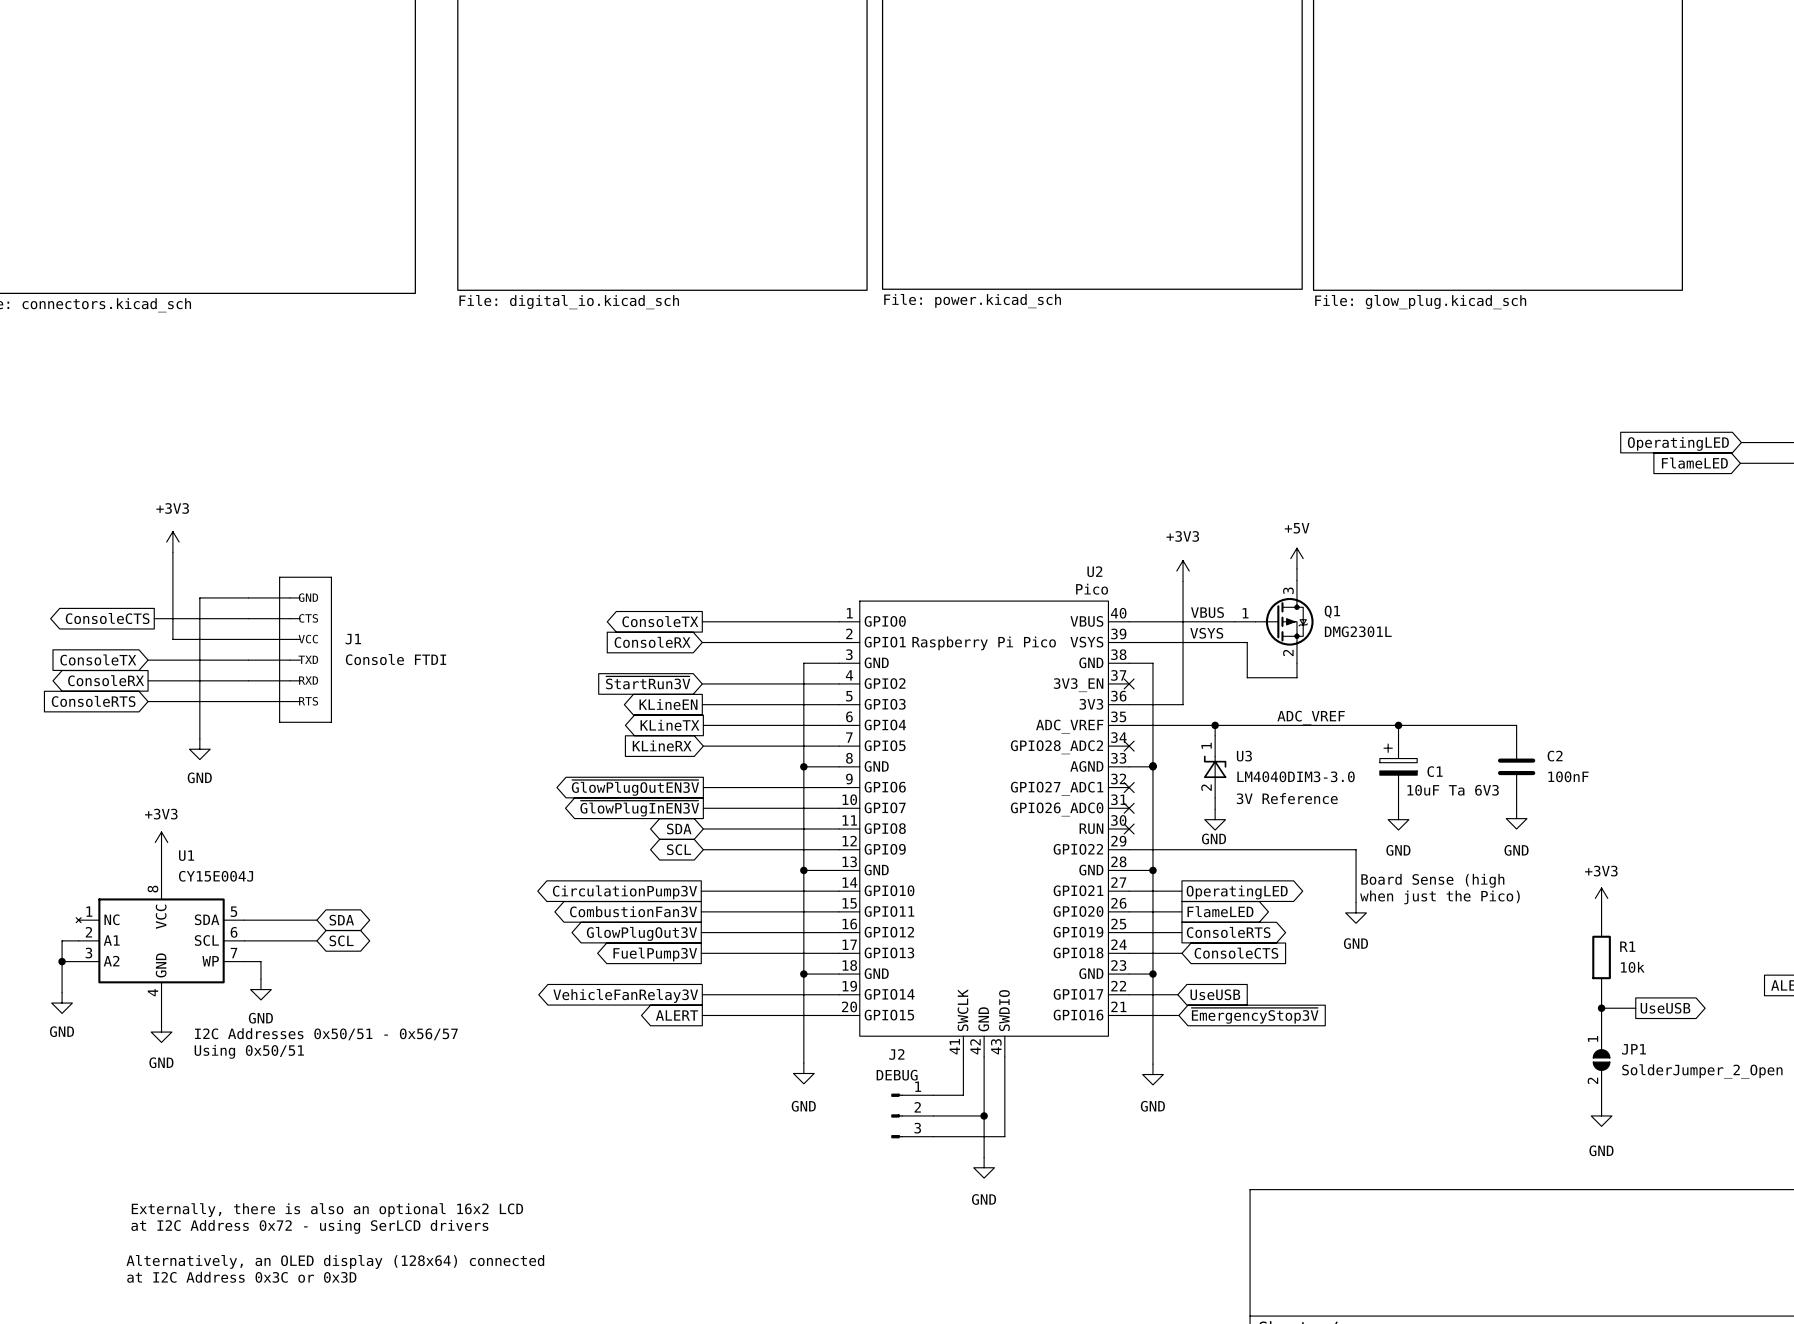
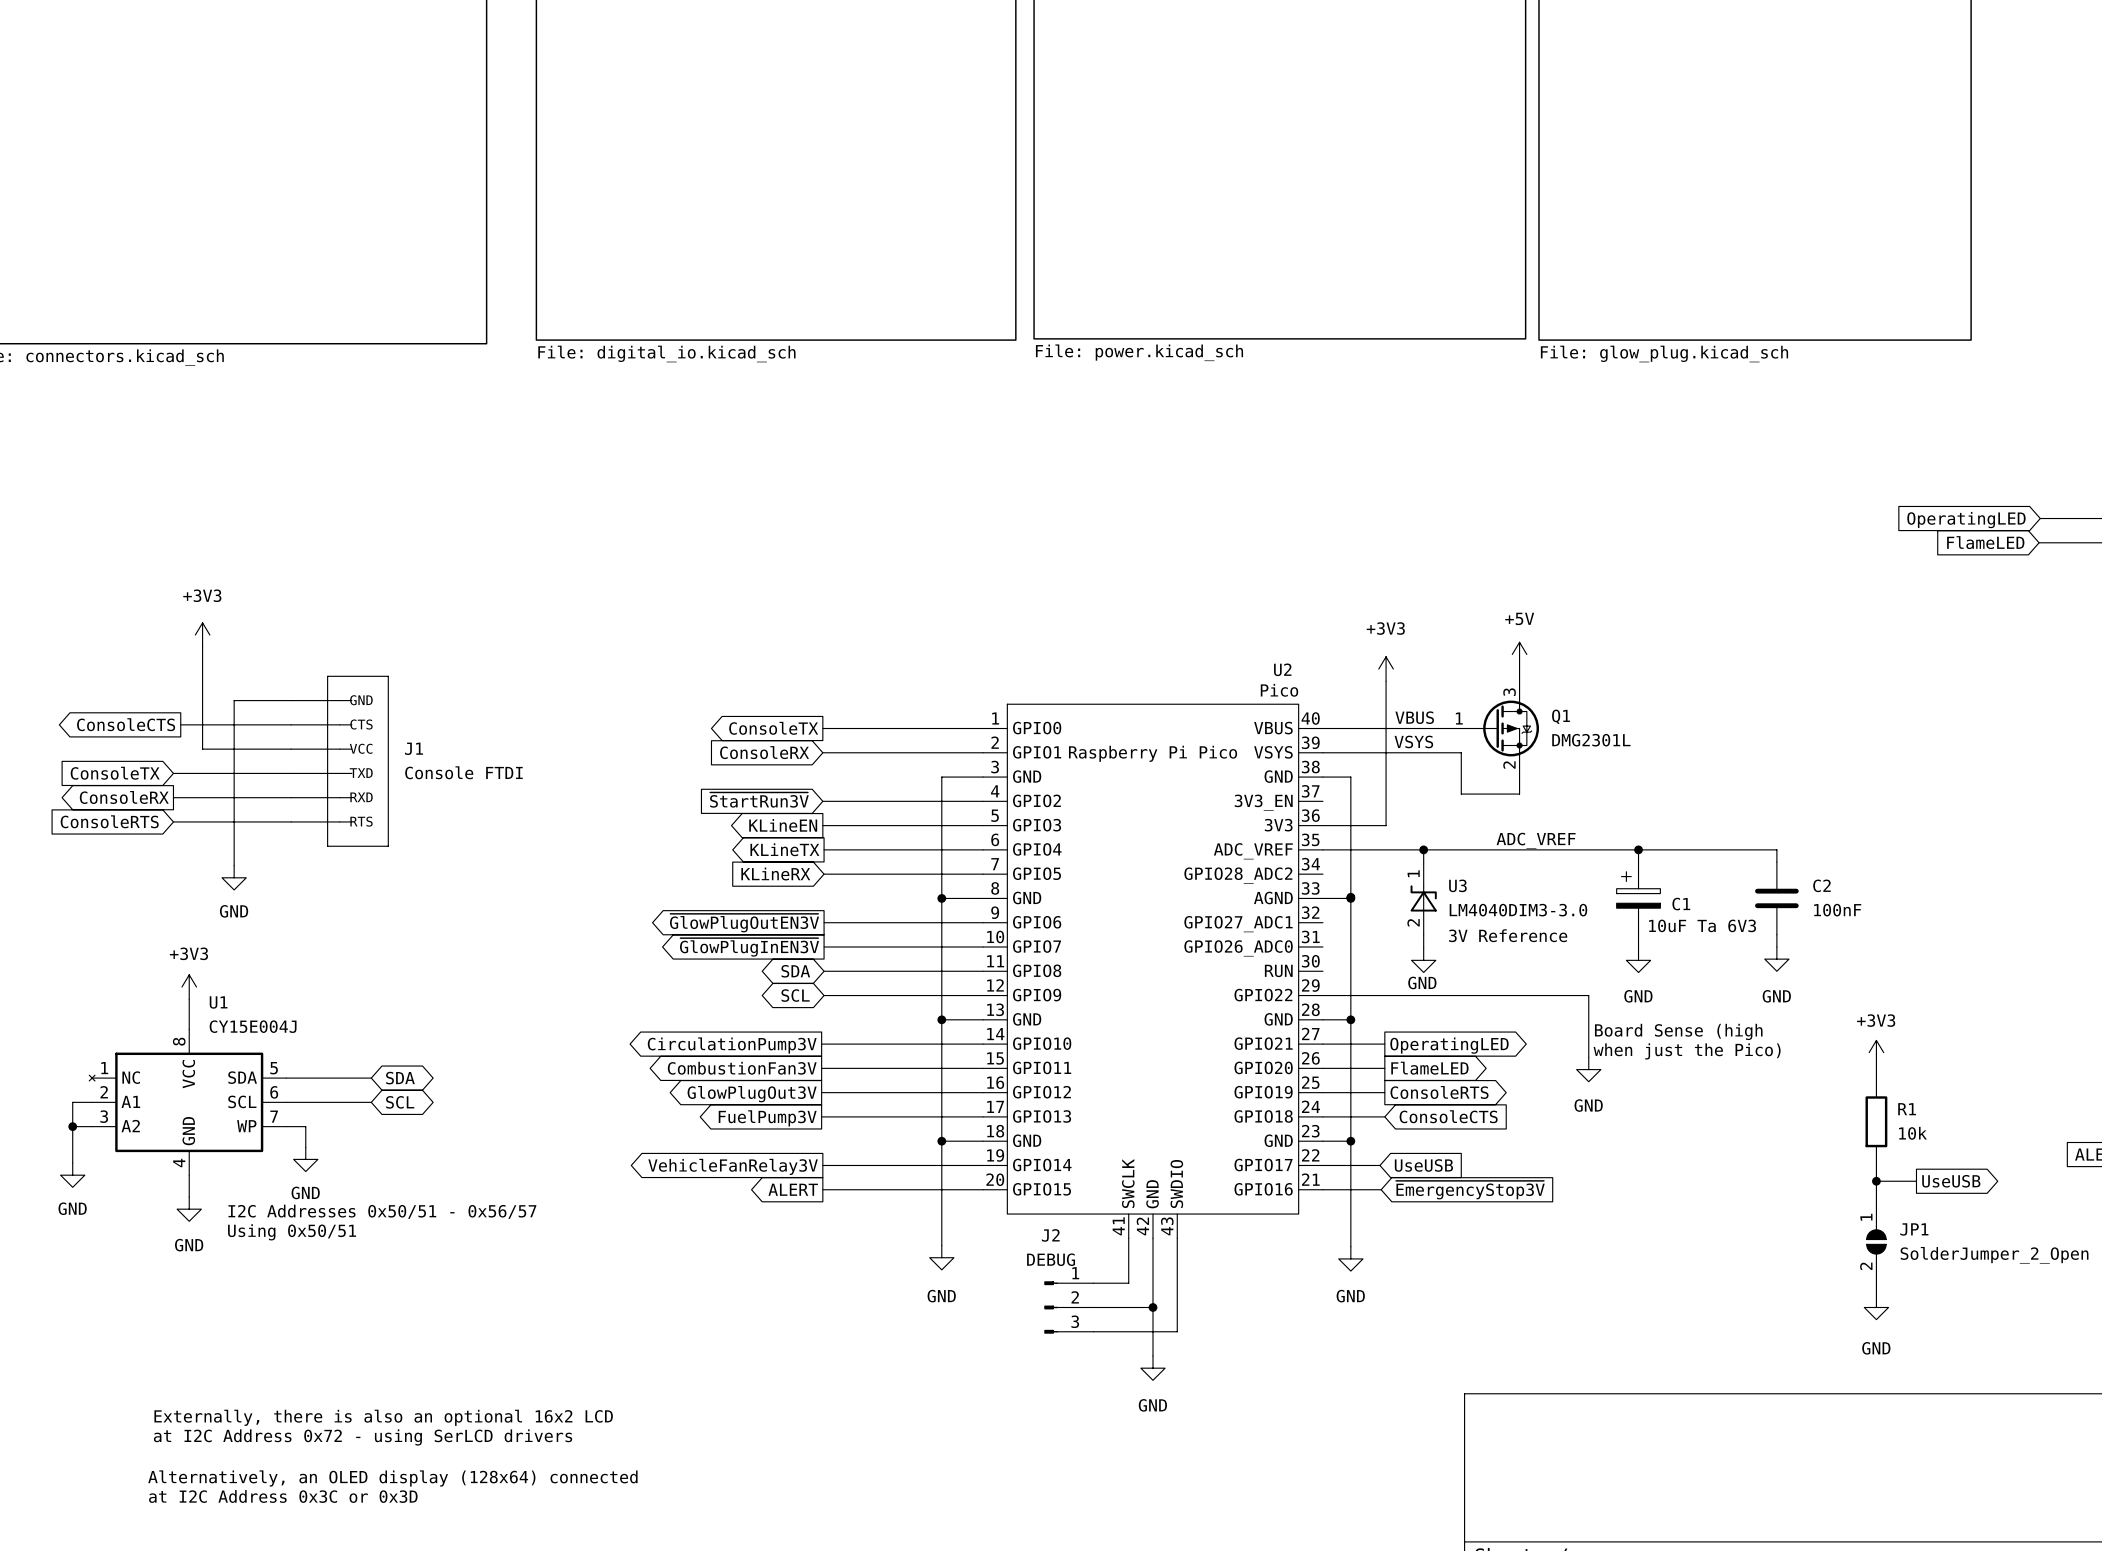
no-connect mark: (1129, 683) -> none
no-connect mark: (1129, 746) -> none
no-connect mark: (1129, 787) -> none
no-connect mark: (1129, 808) -> none
no-connect mark: (1129, 829) -> none

